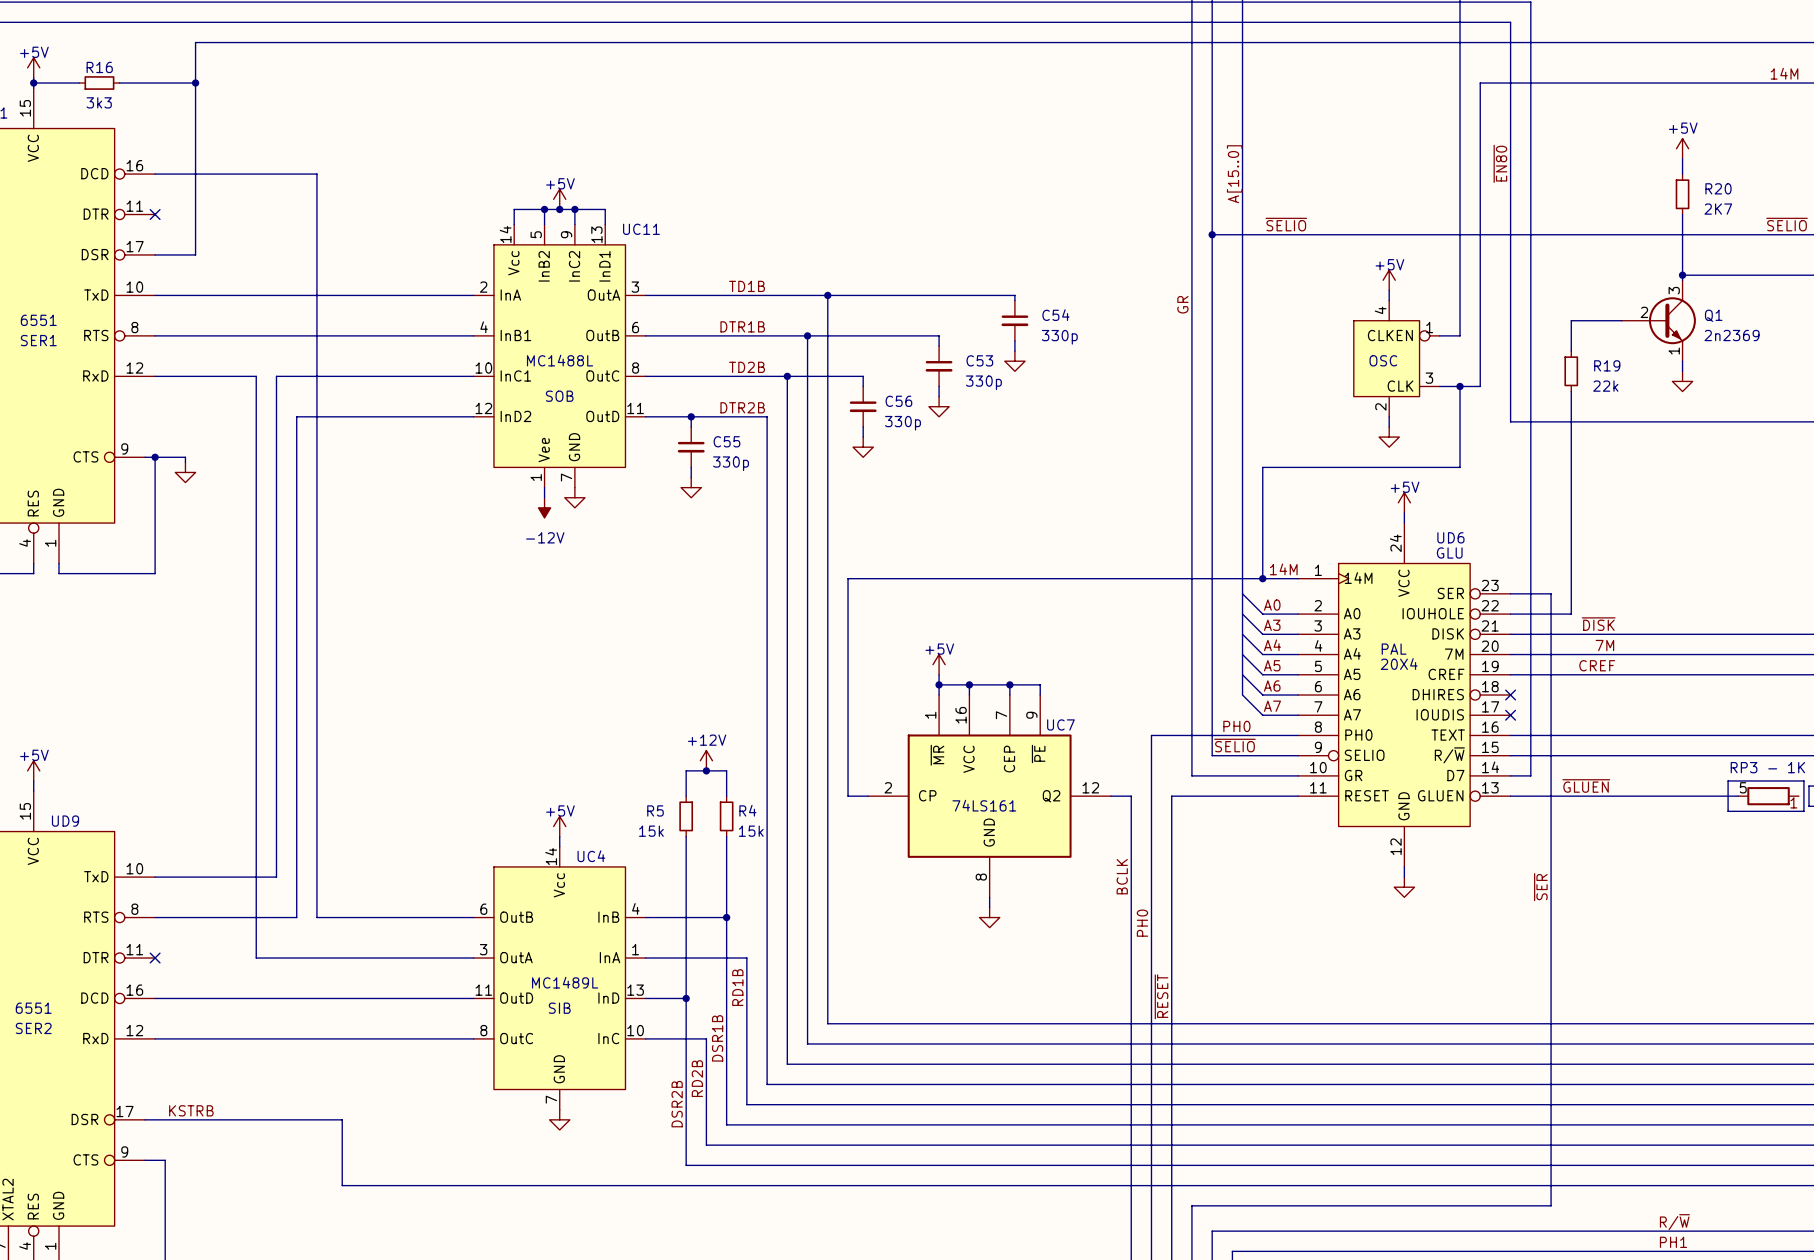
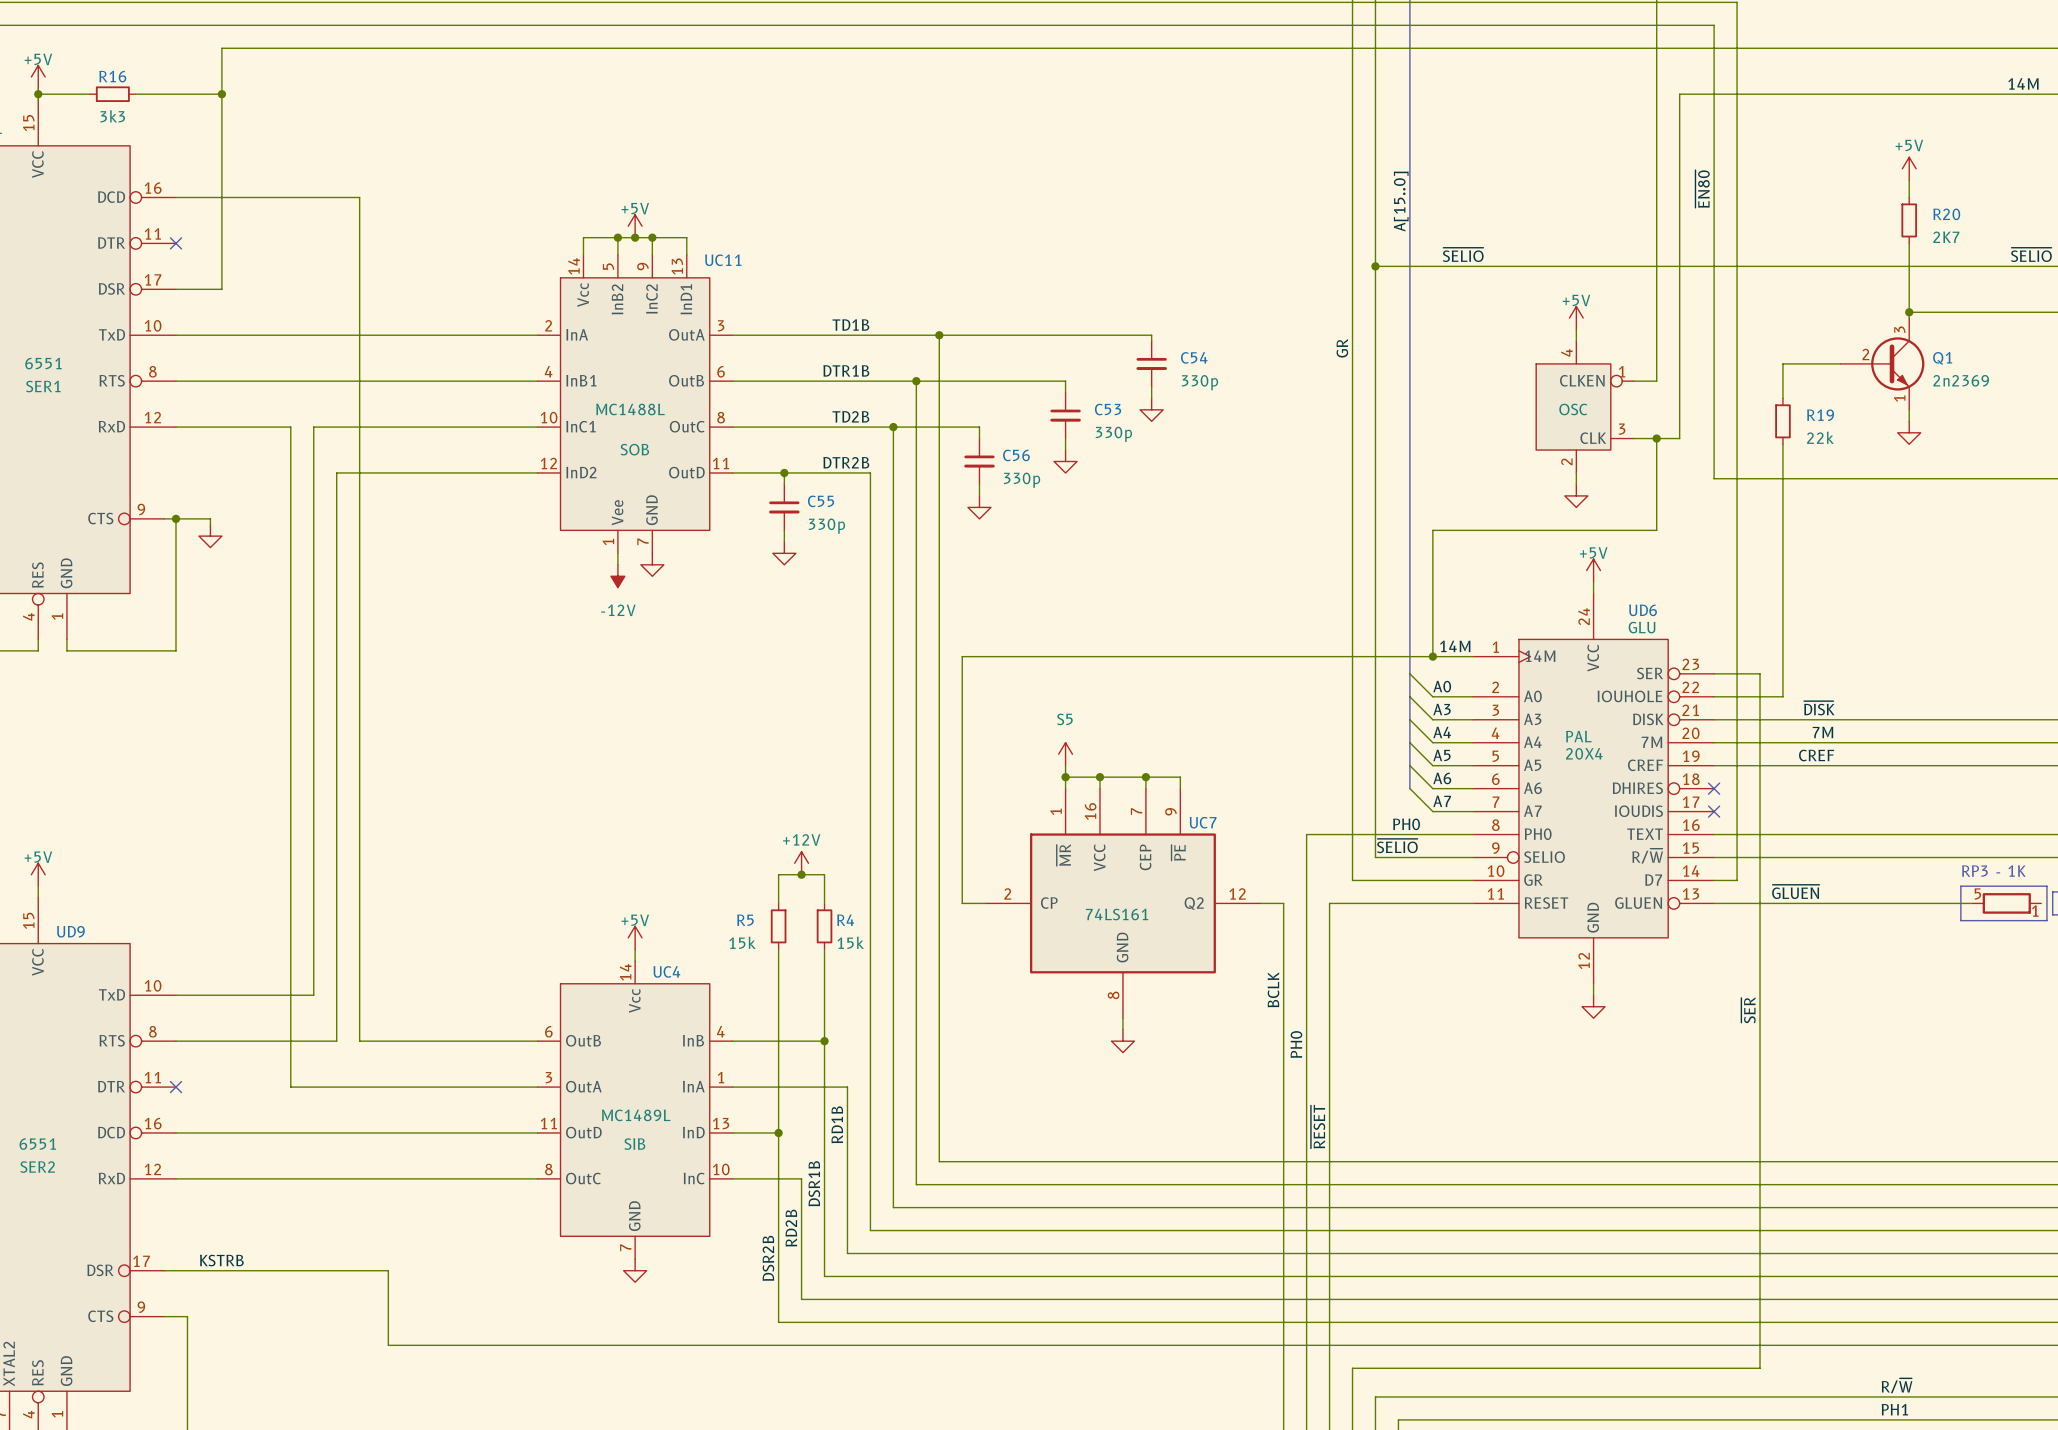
power symbol: +5V (939, 664) -> S5 (1065, 754)

